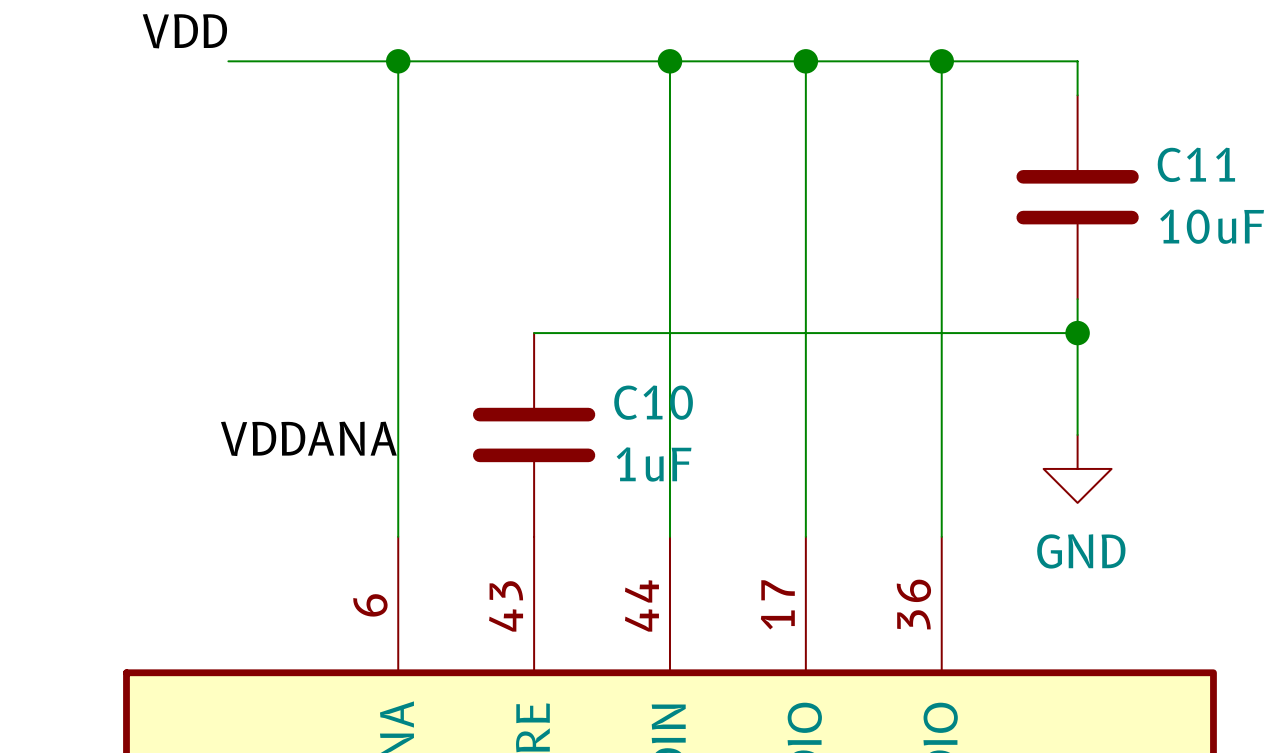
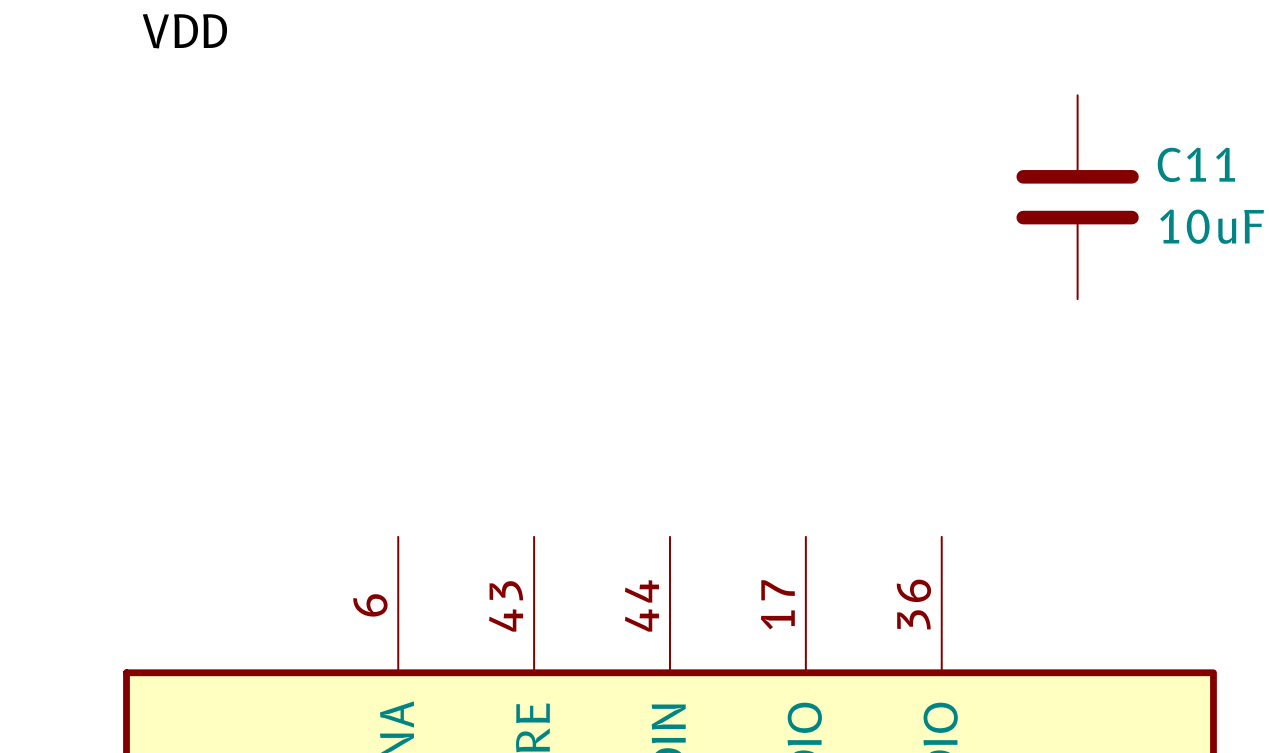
wire: (228, 61) (1077, 61) (1077, 95) -> none
wire: (398, 61) (398, 536) -> none
junction: (398, 61) -> none
wire: (669, 61) (669, 536) -> none
junction: (669, 61) -> none
wire: (805, 61) (805, 536) -> none
junction: (805, 61) -> none
wire: (941, 61) (941, 536) -> none
junction: (941, 61) -> none
wire: (1077, 299) (1077, 434) -> none
wire: (534, 333) (1077, 333) -> none
junction: (1077, 333) -> none
C10: 1uF (534, 434) -> none
label: VDDANA (308, 438) -> none
power symbol: GND (1077, 468) -> none

